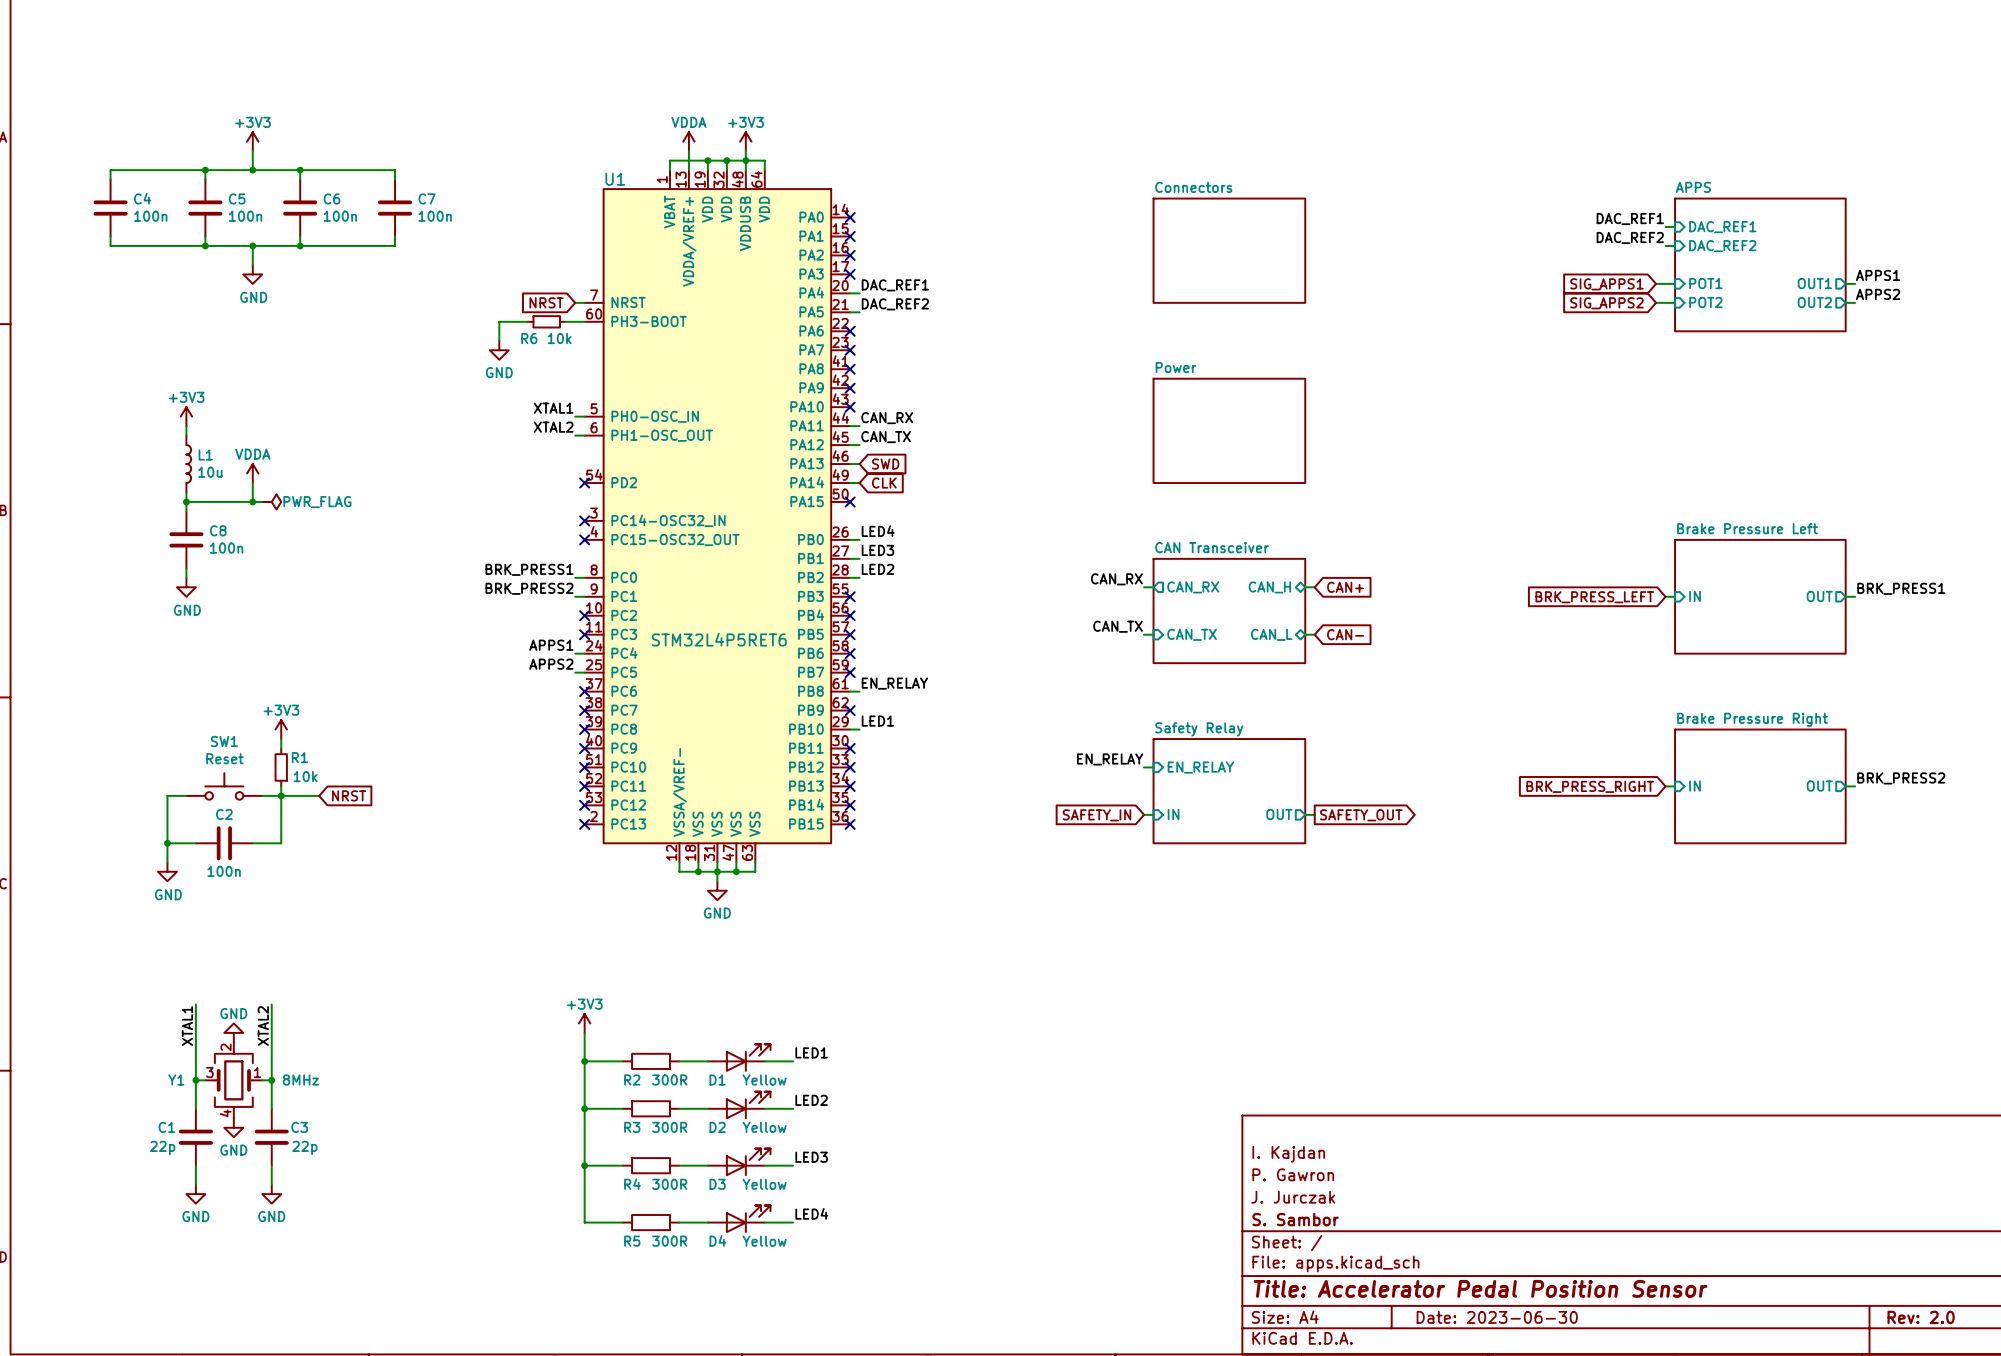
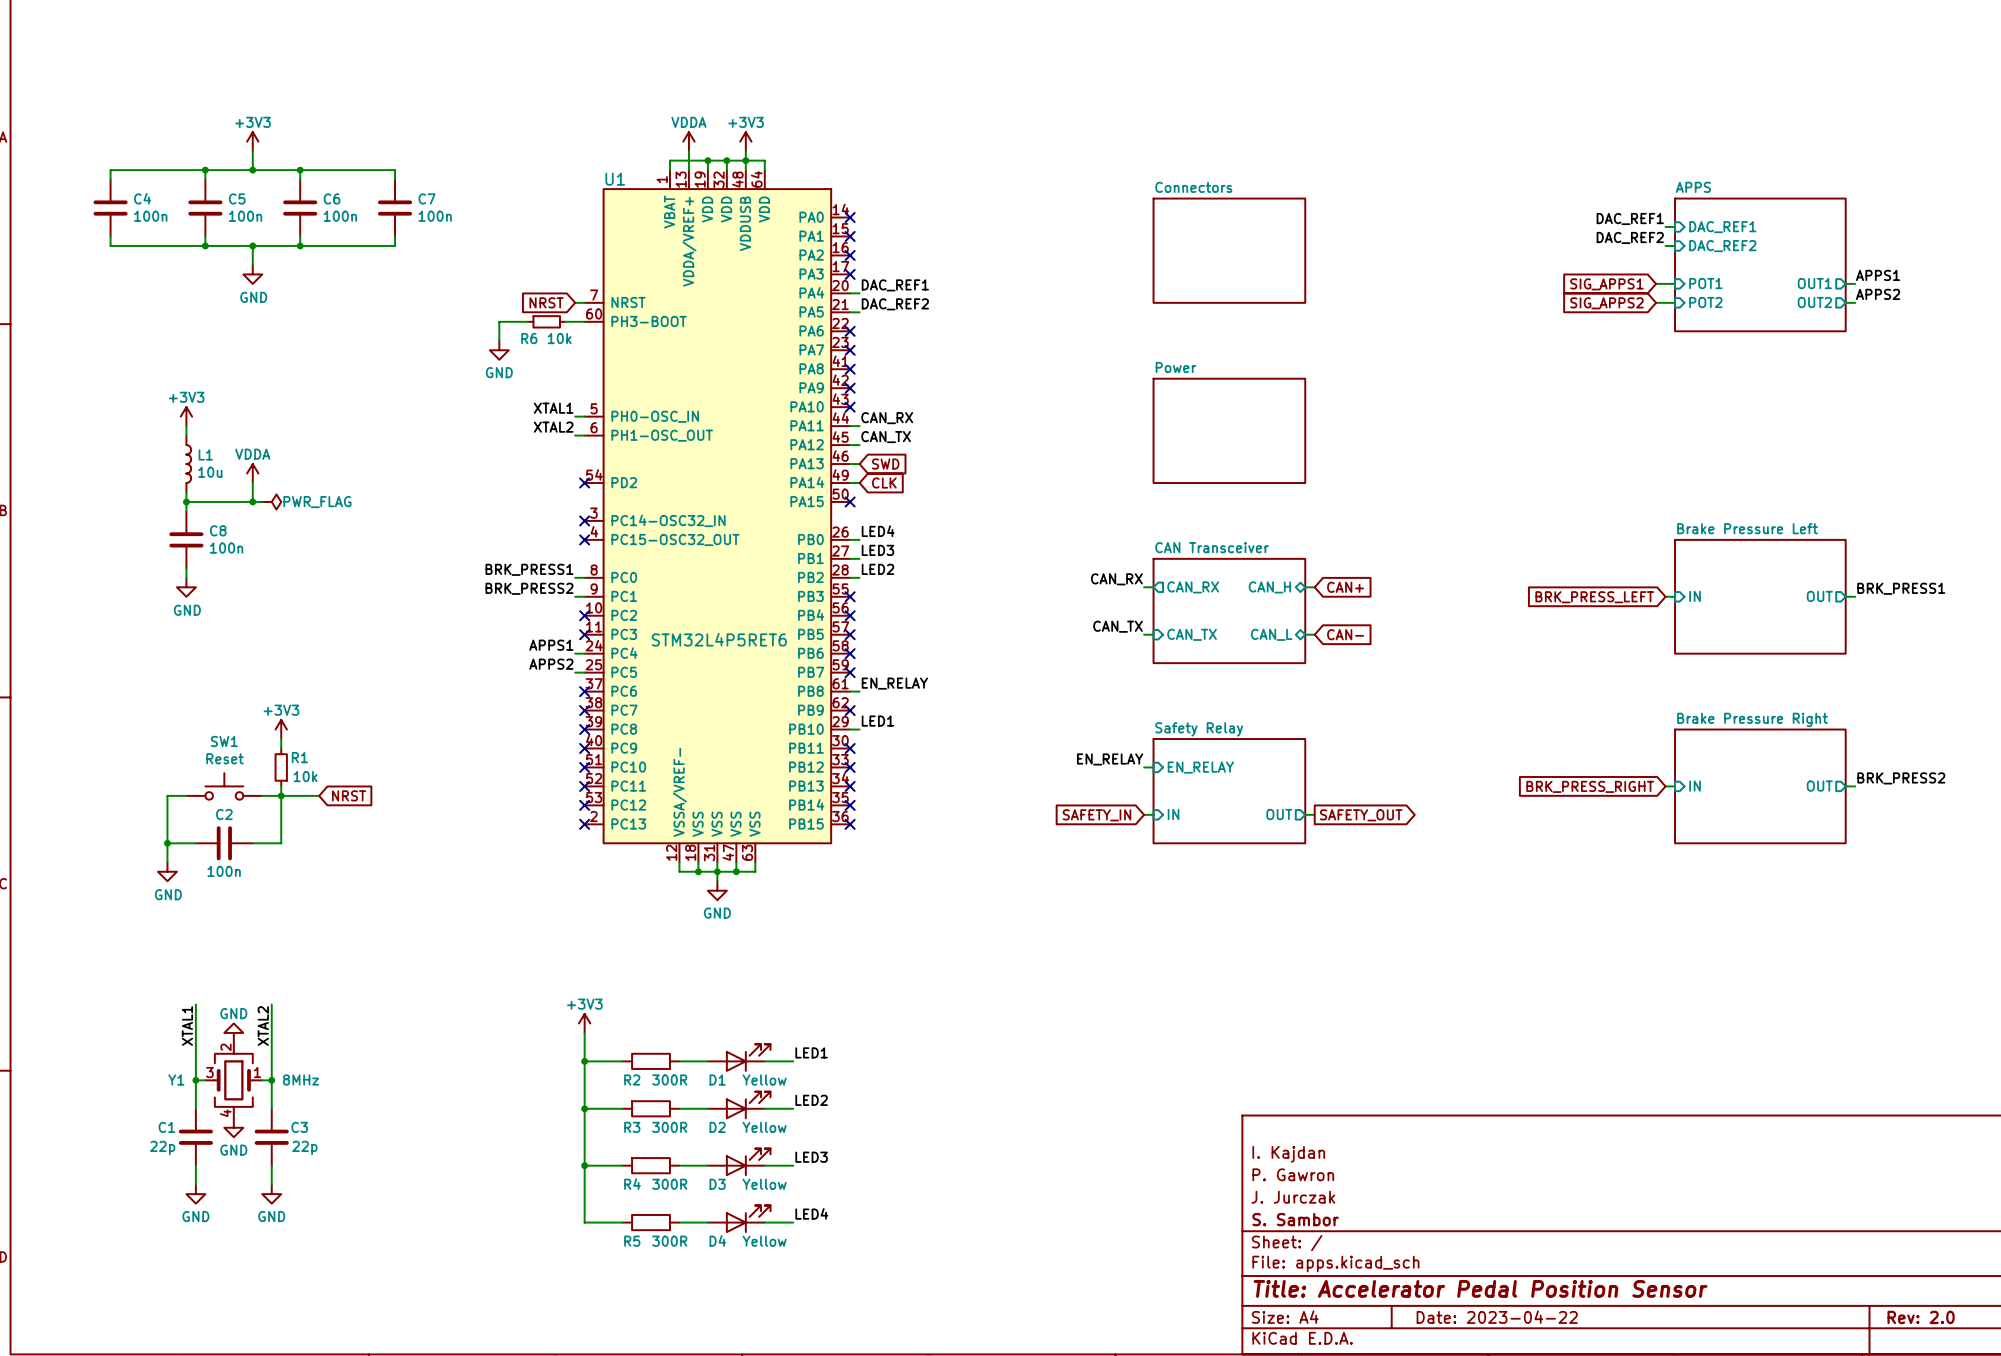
title block: Date: 2023-06-30 (1497, 1317) -> Date: 2023-04-22 (1497, 1317)

